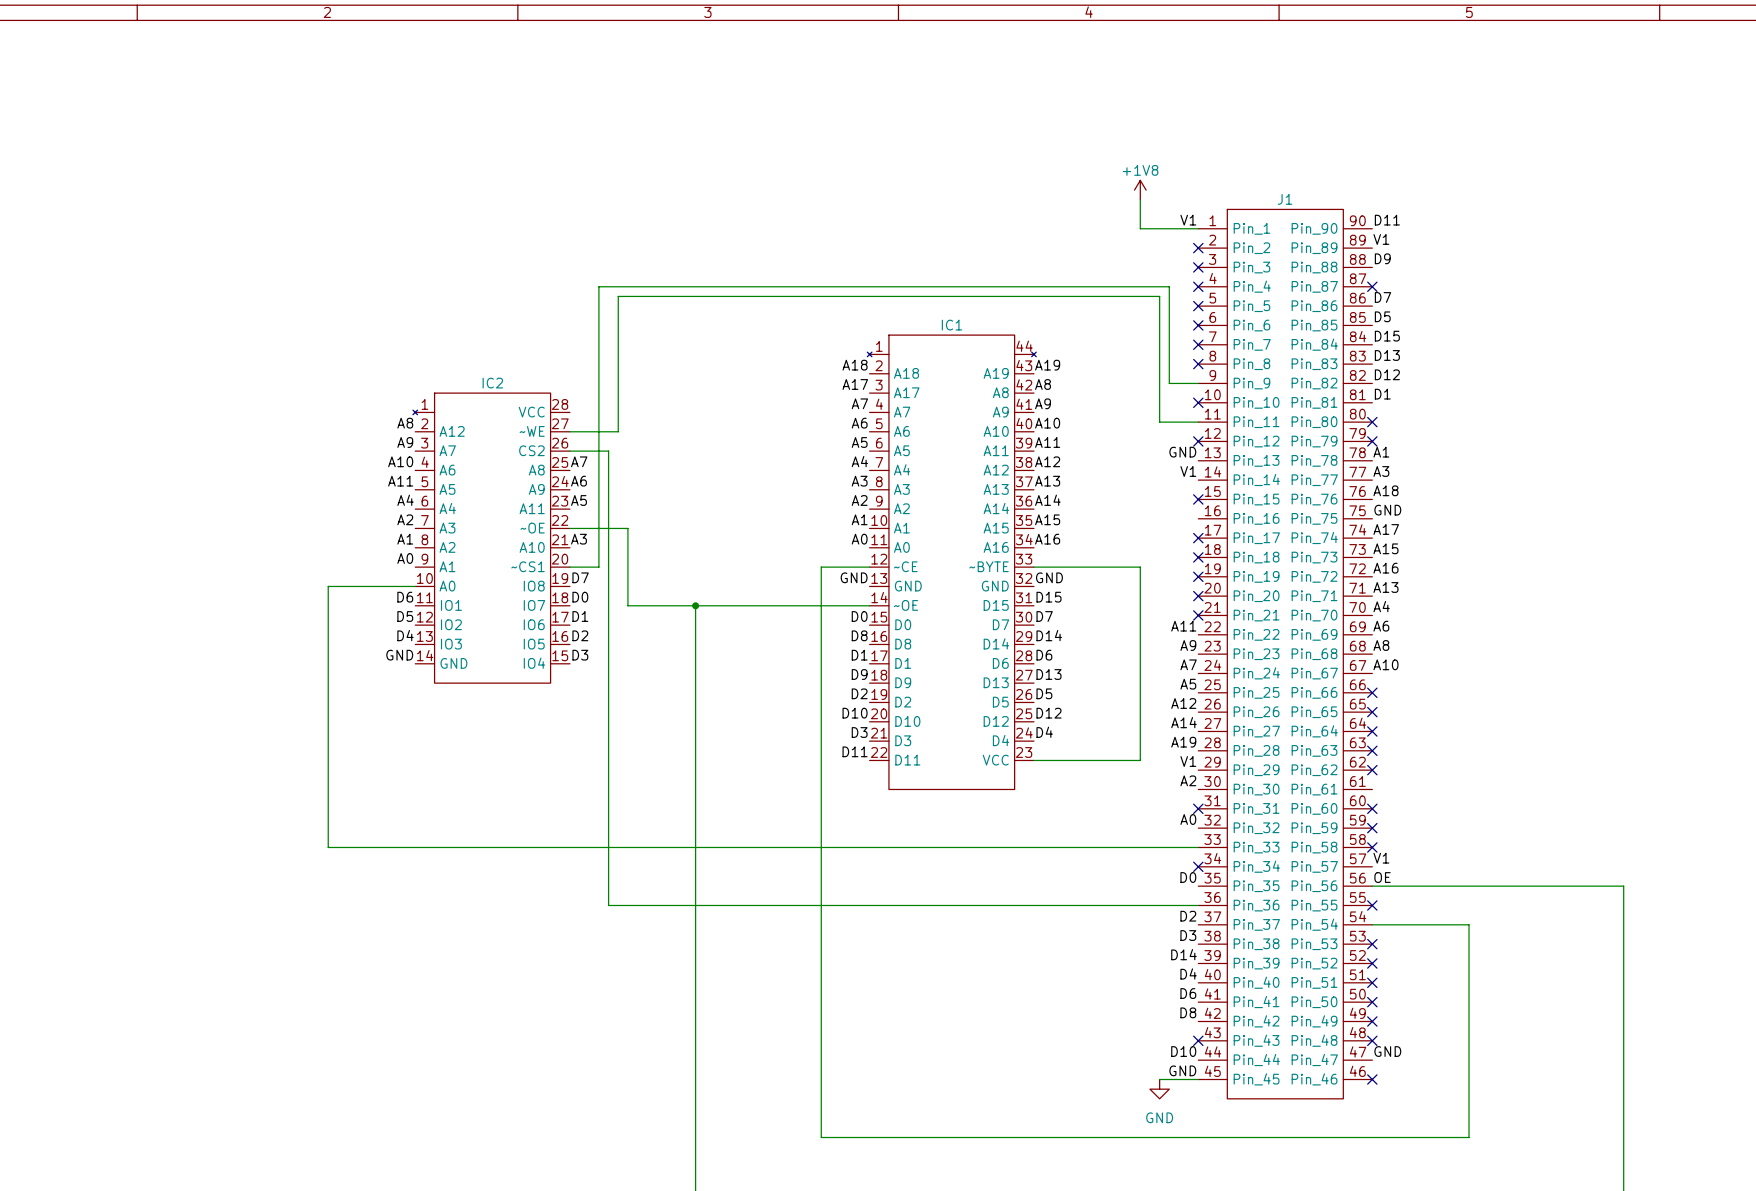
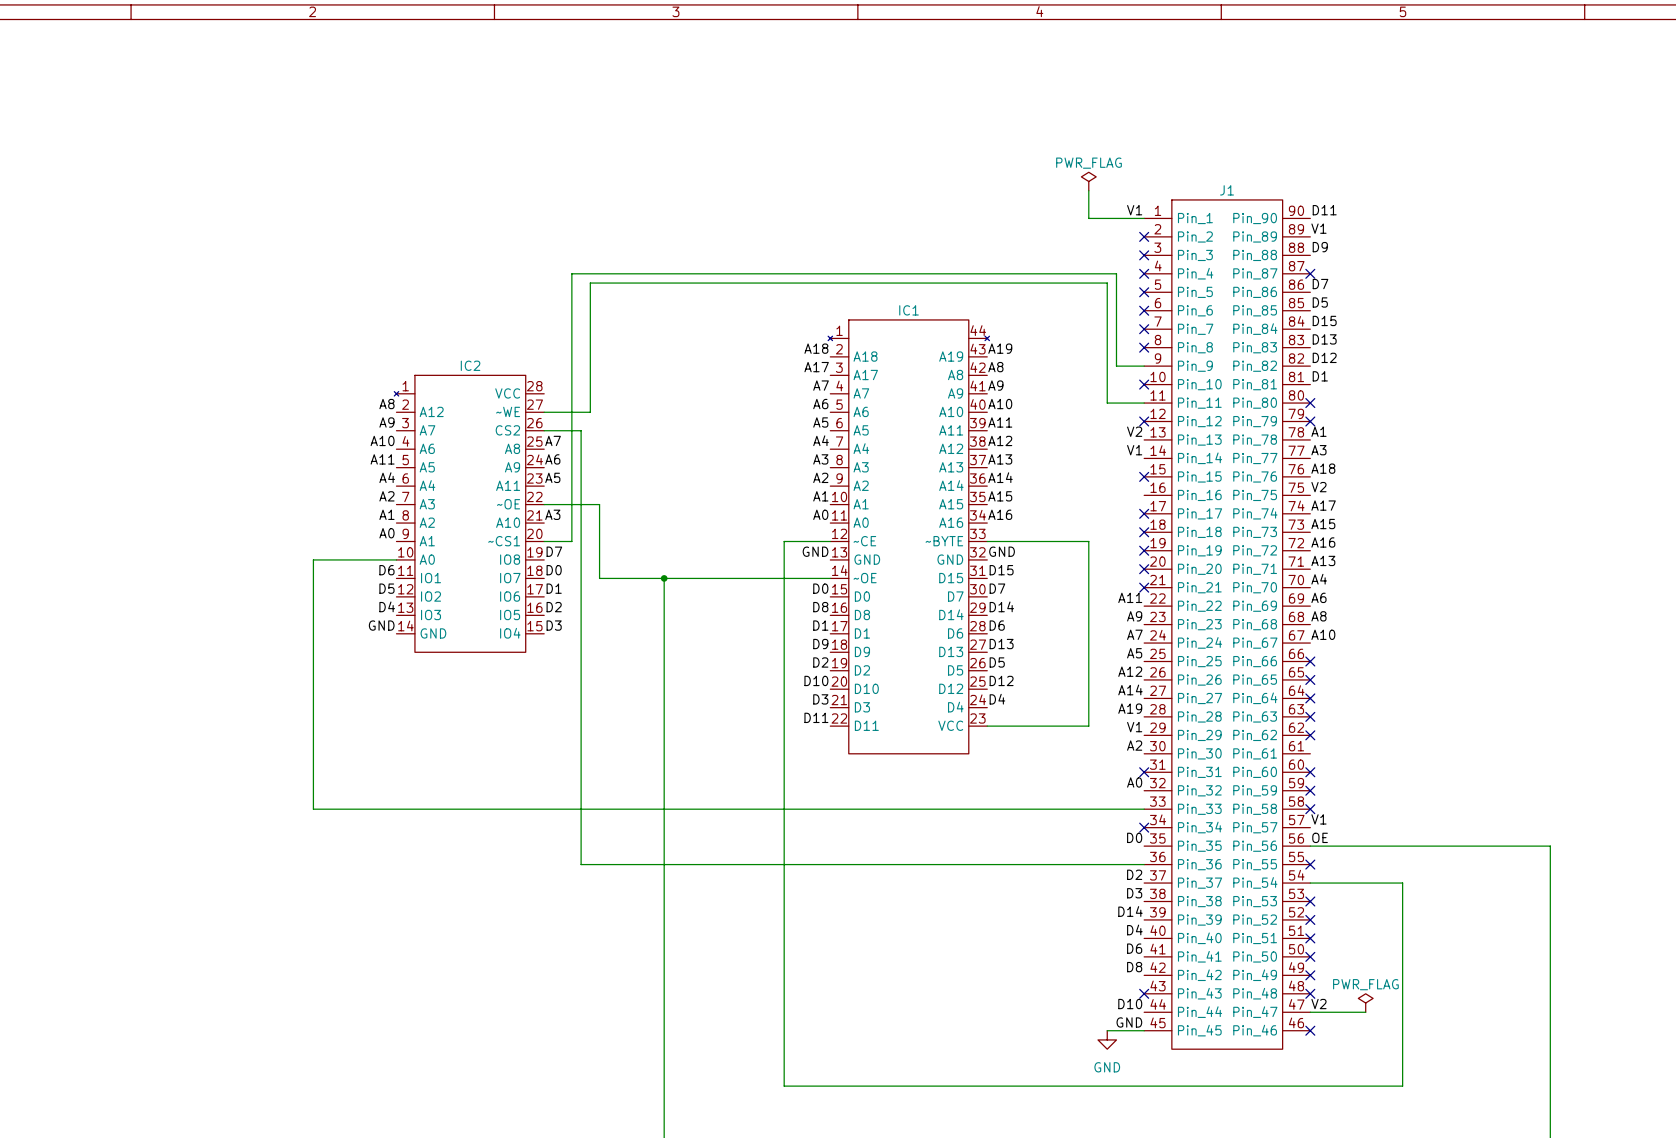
power symbol: +1V8 (1140, 190) -> PWR_FLAG (1088, 181)
label: GND (1182, 452) -> V2 (1134, 431)
label: GND (1387, 510) -> V2 (1318, 487)
power symbol: none -> PWR_FLAG (1365, 1003)
label: GND (1387, 1051) -> V2 (1318, 1004)
wire: none -> (1310, 1012) (1365, 1012)

